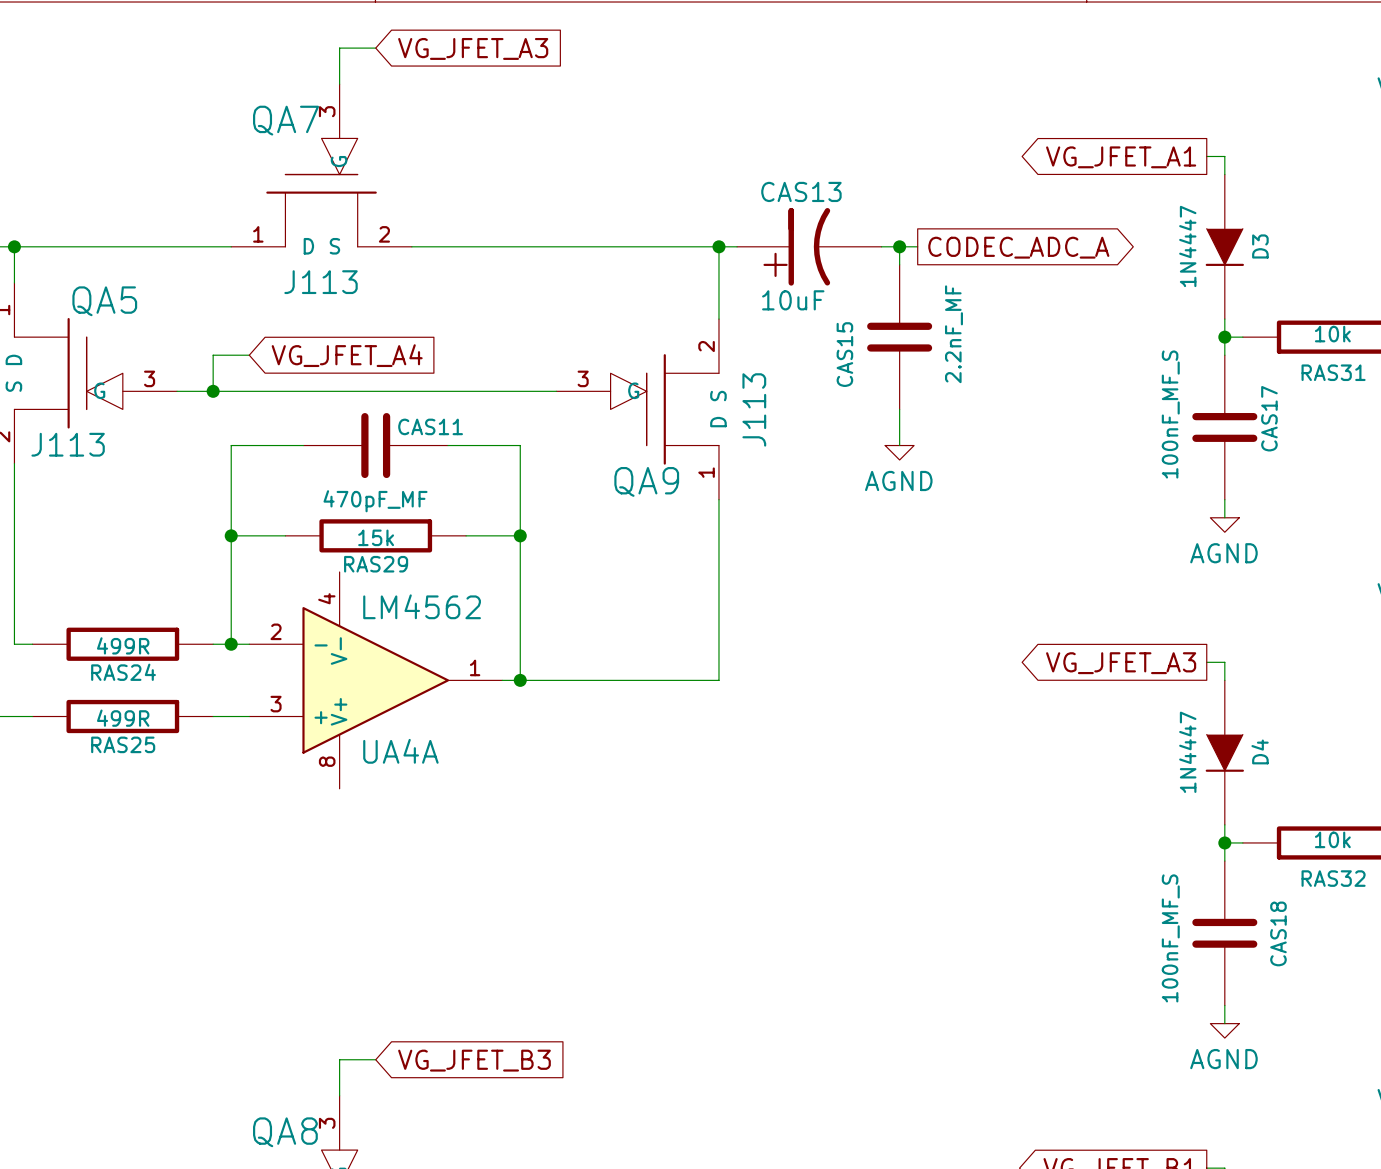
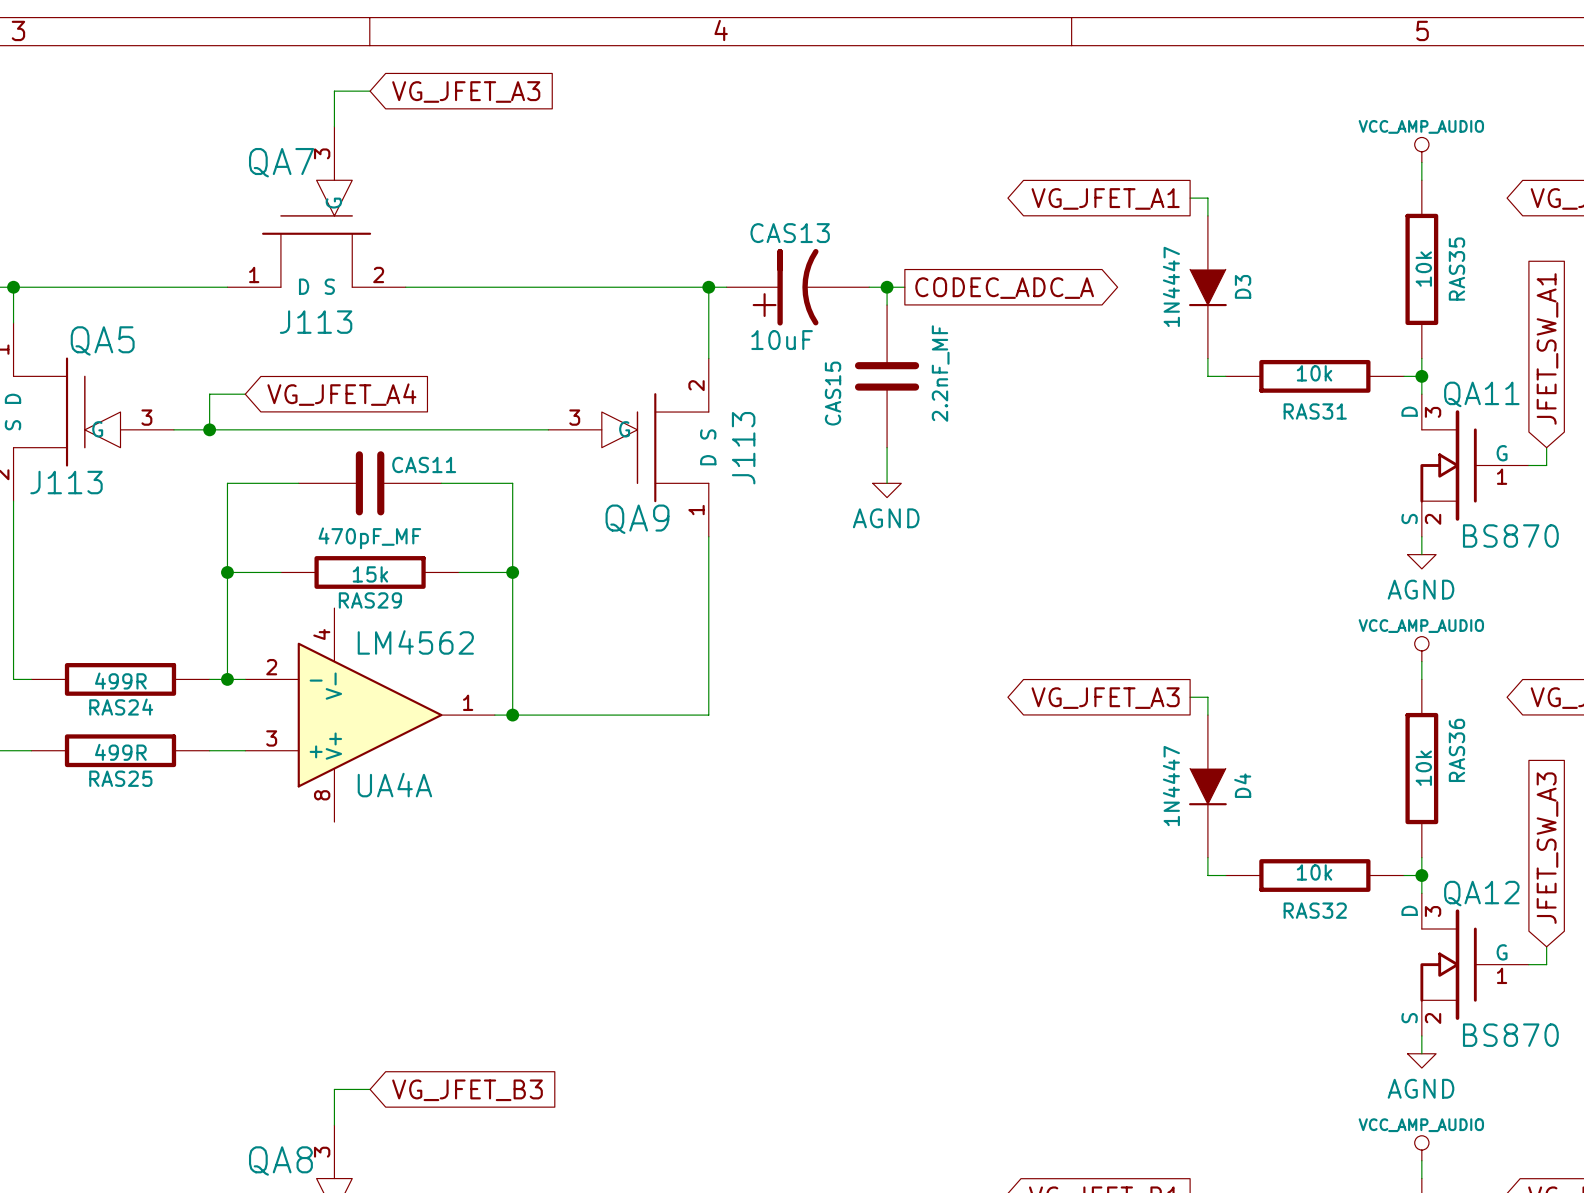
wire: (1224, 337) (1224, 355) -> none
junction: (1224, 337) -> none
CAS17: 100nF_MF_S (1224, 427) -> none
wire: (1224, 499) (1224, 517) -> none
power symbol: AGND (1224, 525) -> none
wire: (1224, 842) (1224, 861) -> none
junction: (1224, 842) -> none
CAS18: 100nF_MF_S (1224, 933) -> none
wire: (1224, 1005) (1224, 1023) -> none
power symbol: AGND (1224, 1030) -> none

